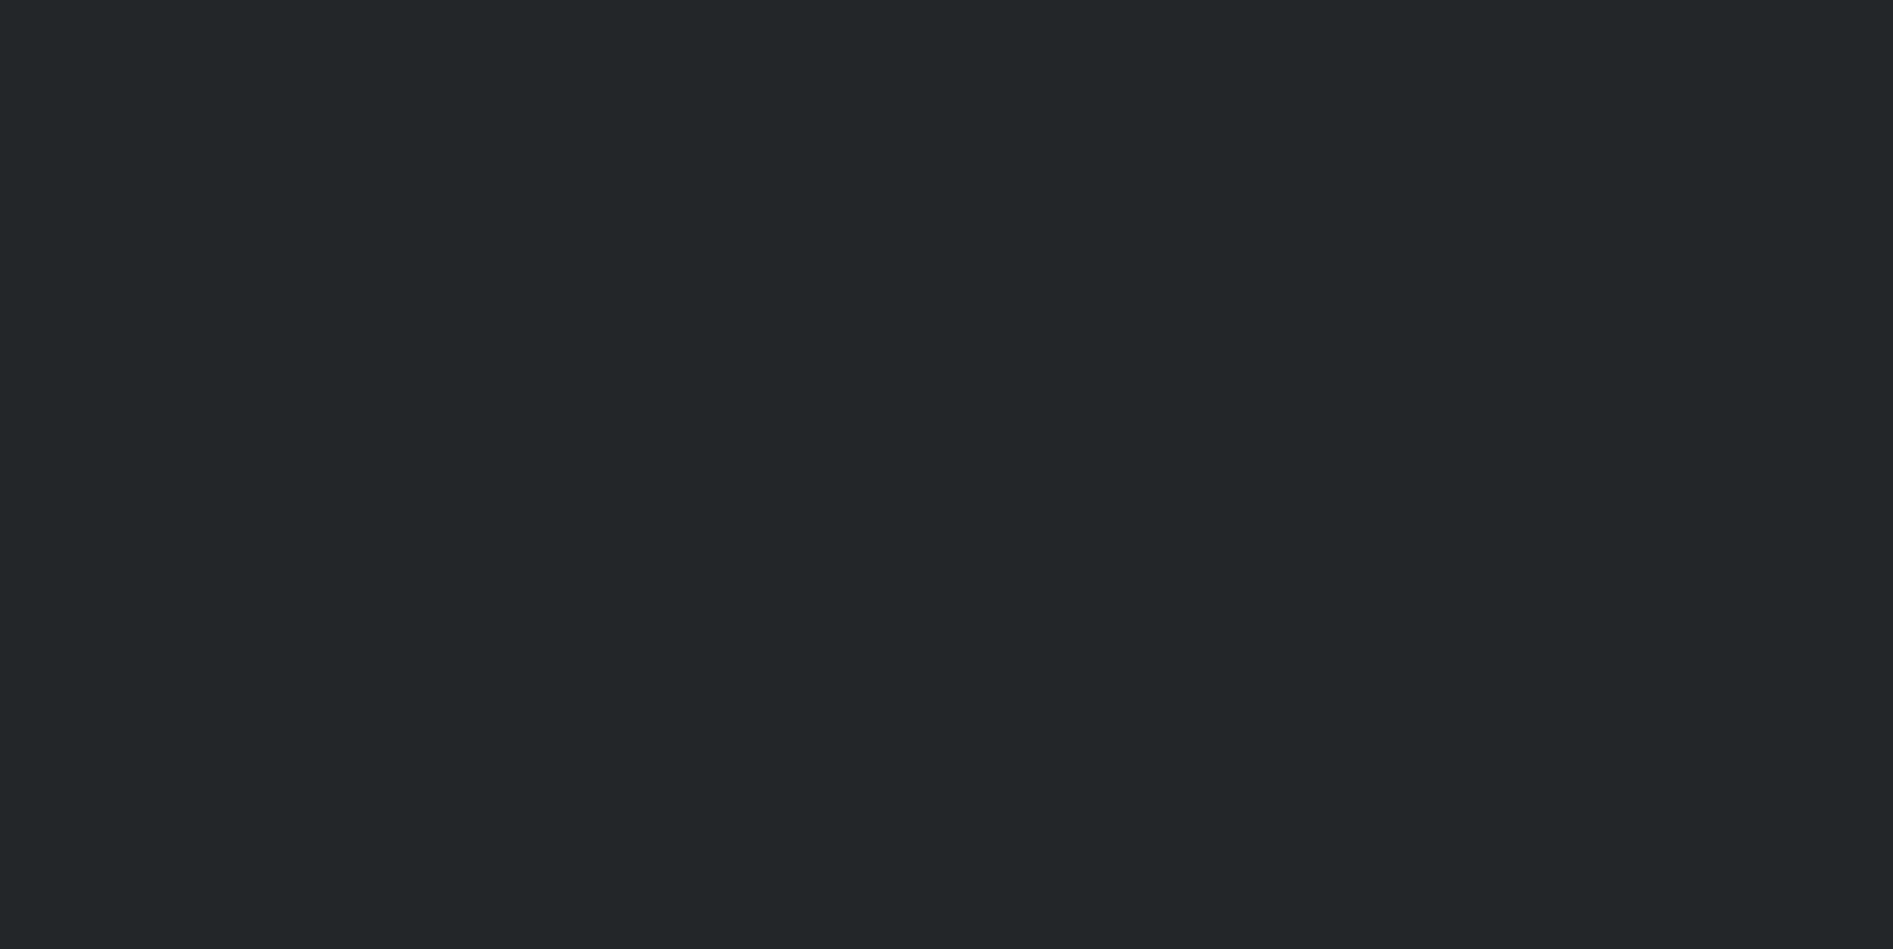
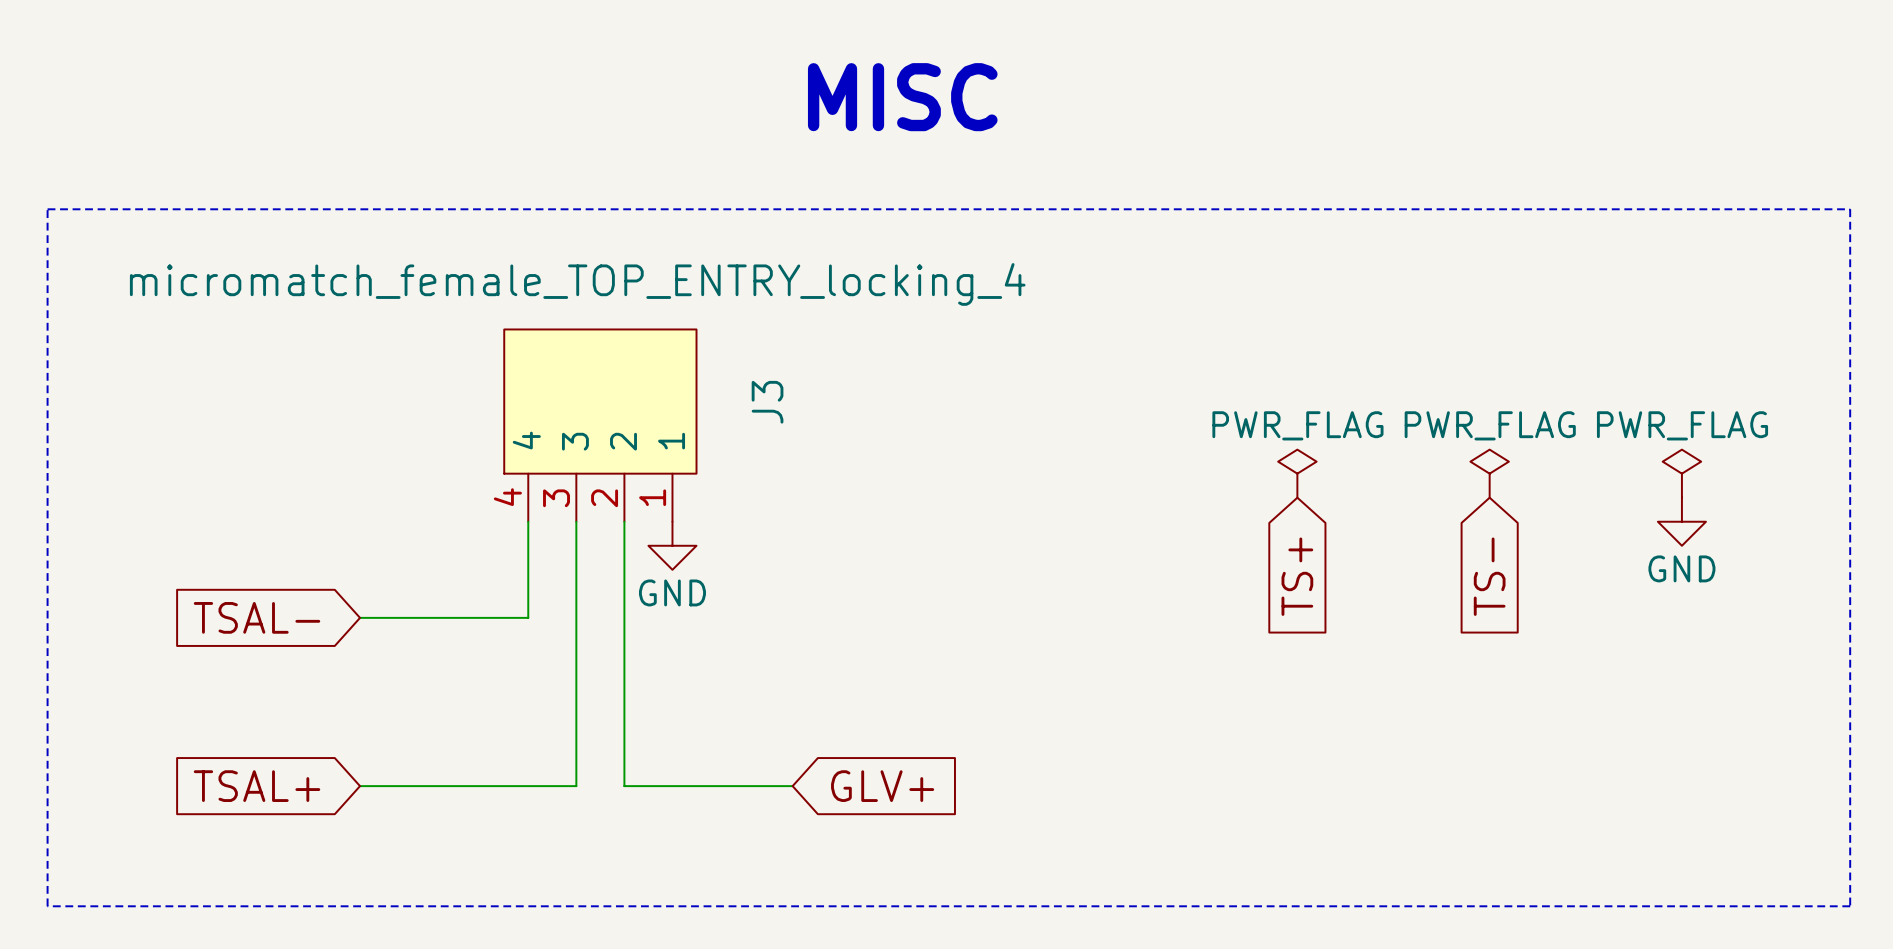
text: none -> MISC (902, 97)
line: none -> (47, 209) (1850, 209) (1850, 906) (47, 906) (47, 209)
J3: none -> micromatch_female_TOP_ENTRY_locking_4 (600, 425)
power symbol: none -> PWR_FLAG (1297, 473)
power symbol: none -> PWR_FLAG (1489, 473)
power symbol: none -> PWR_FLAG (1681, 473)
wire: none -> (528, 521) (528, 617) (360, 617)
wire: none -> (576, 521) (576, 786) (360, 786)
wire: none -> (624, 521) (624, 786) (792, 786)
power symbol: none -> GND (1681, 521)
power symbol: none -> GND (672, 545)
global label: none -> TS+ (1297, 576)
global label: none -> TS- (1489, 576)
global label: none -> TSAL- (257, 617)
global label: none -> TSAL+ (257, 786)
global label: none -> GLV+ (882, 786)

